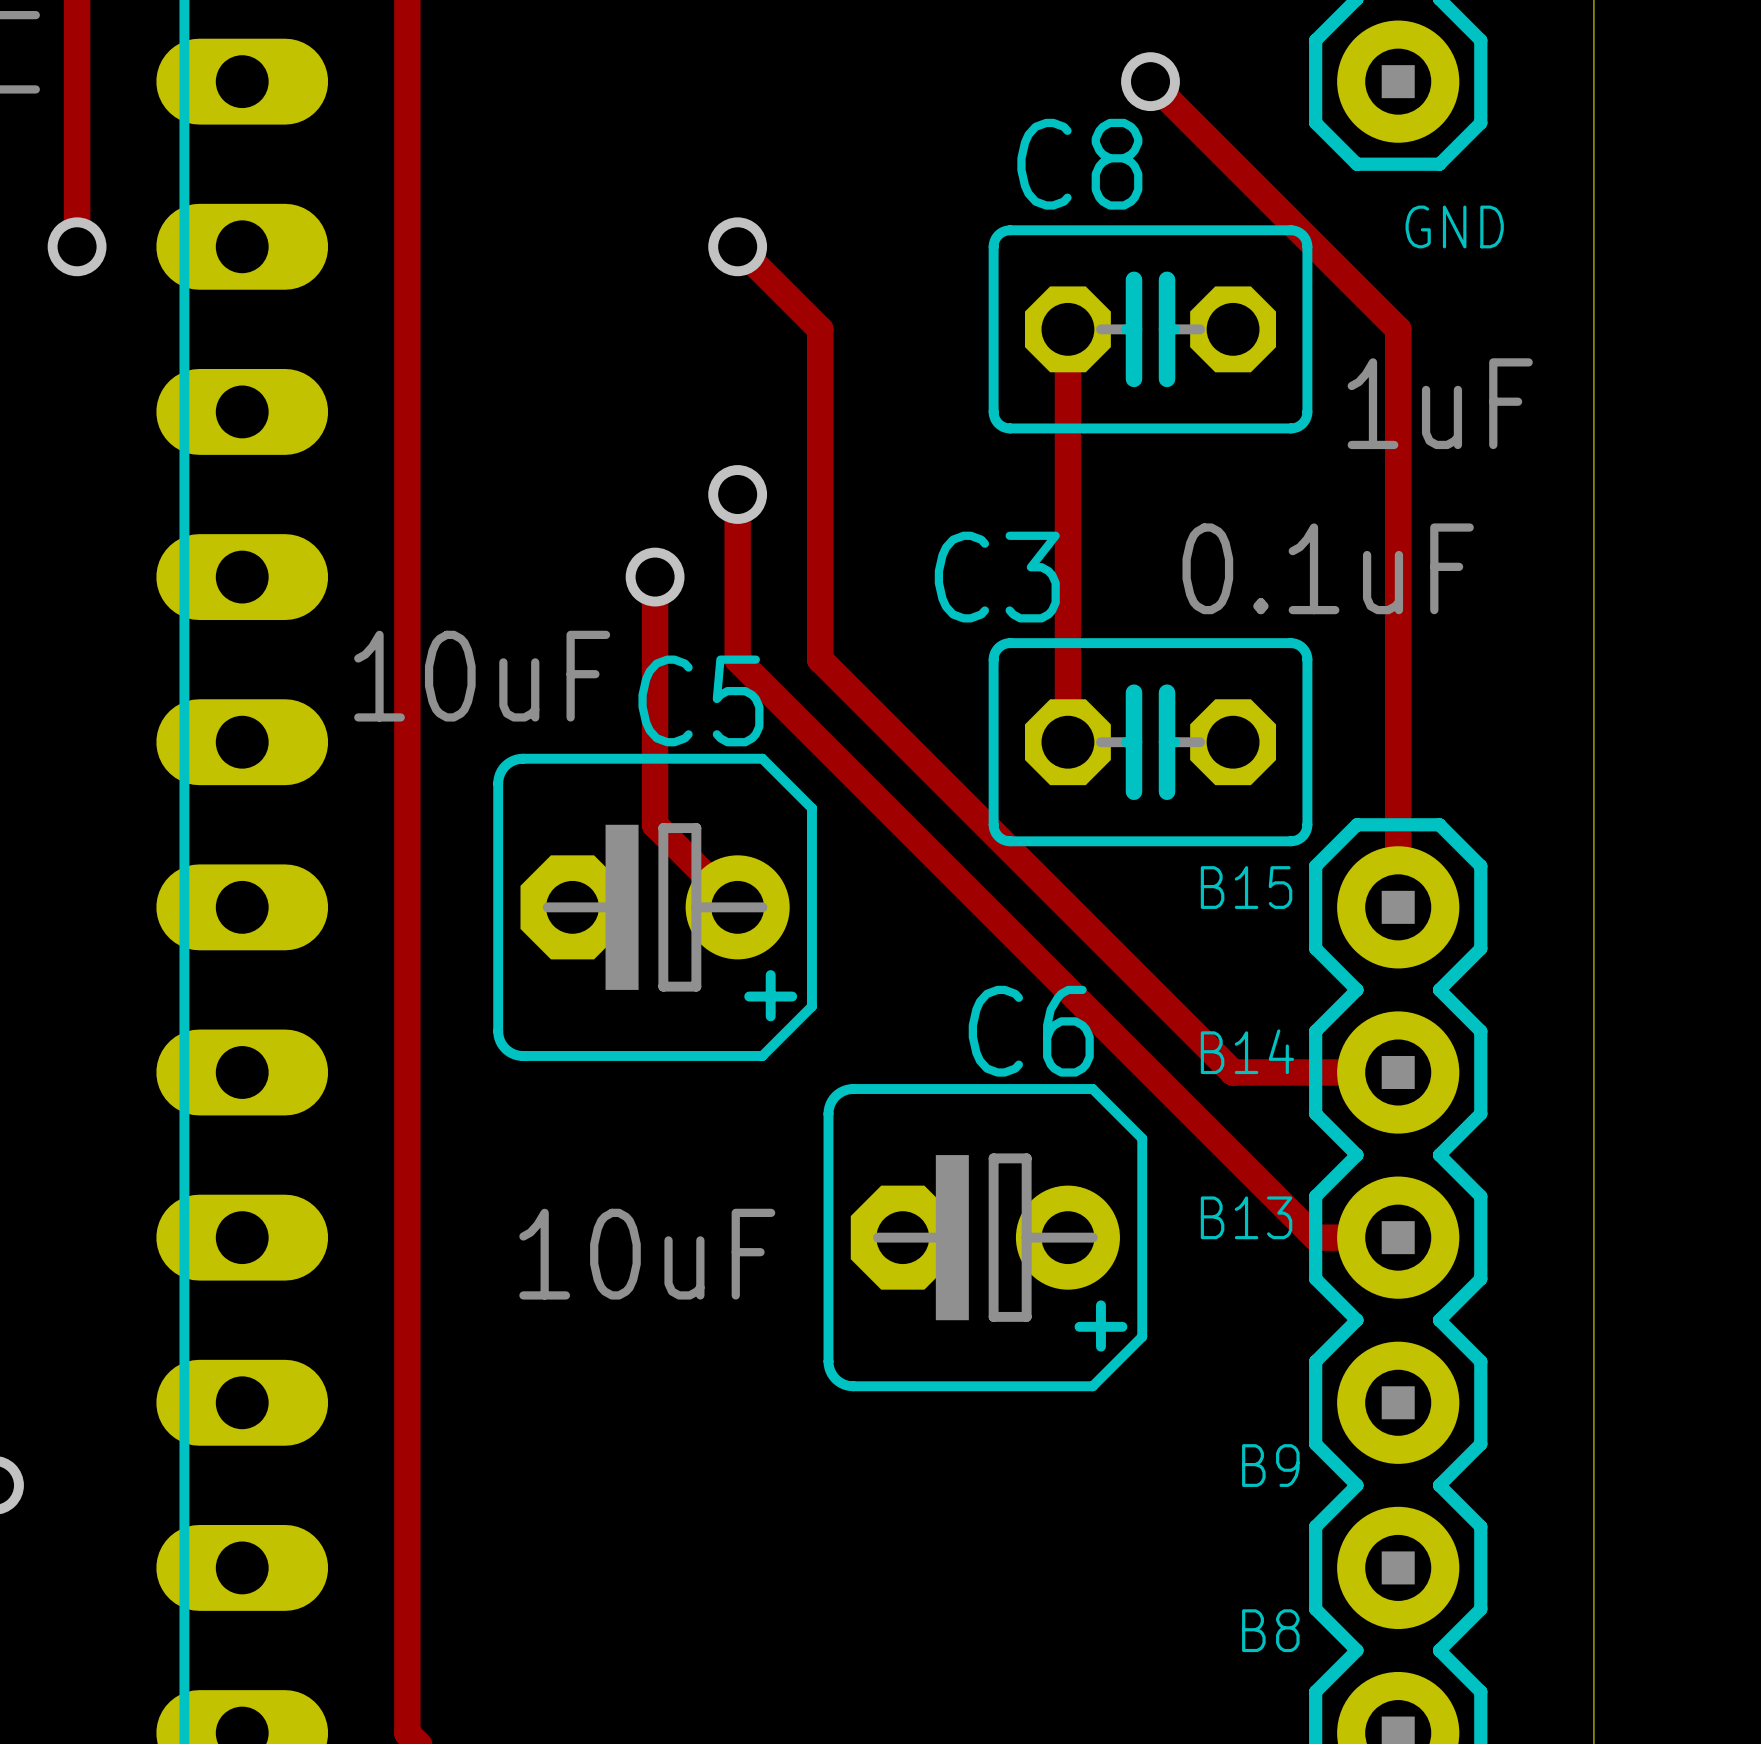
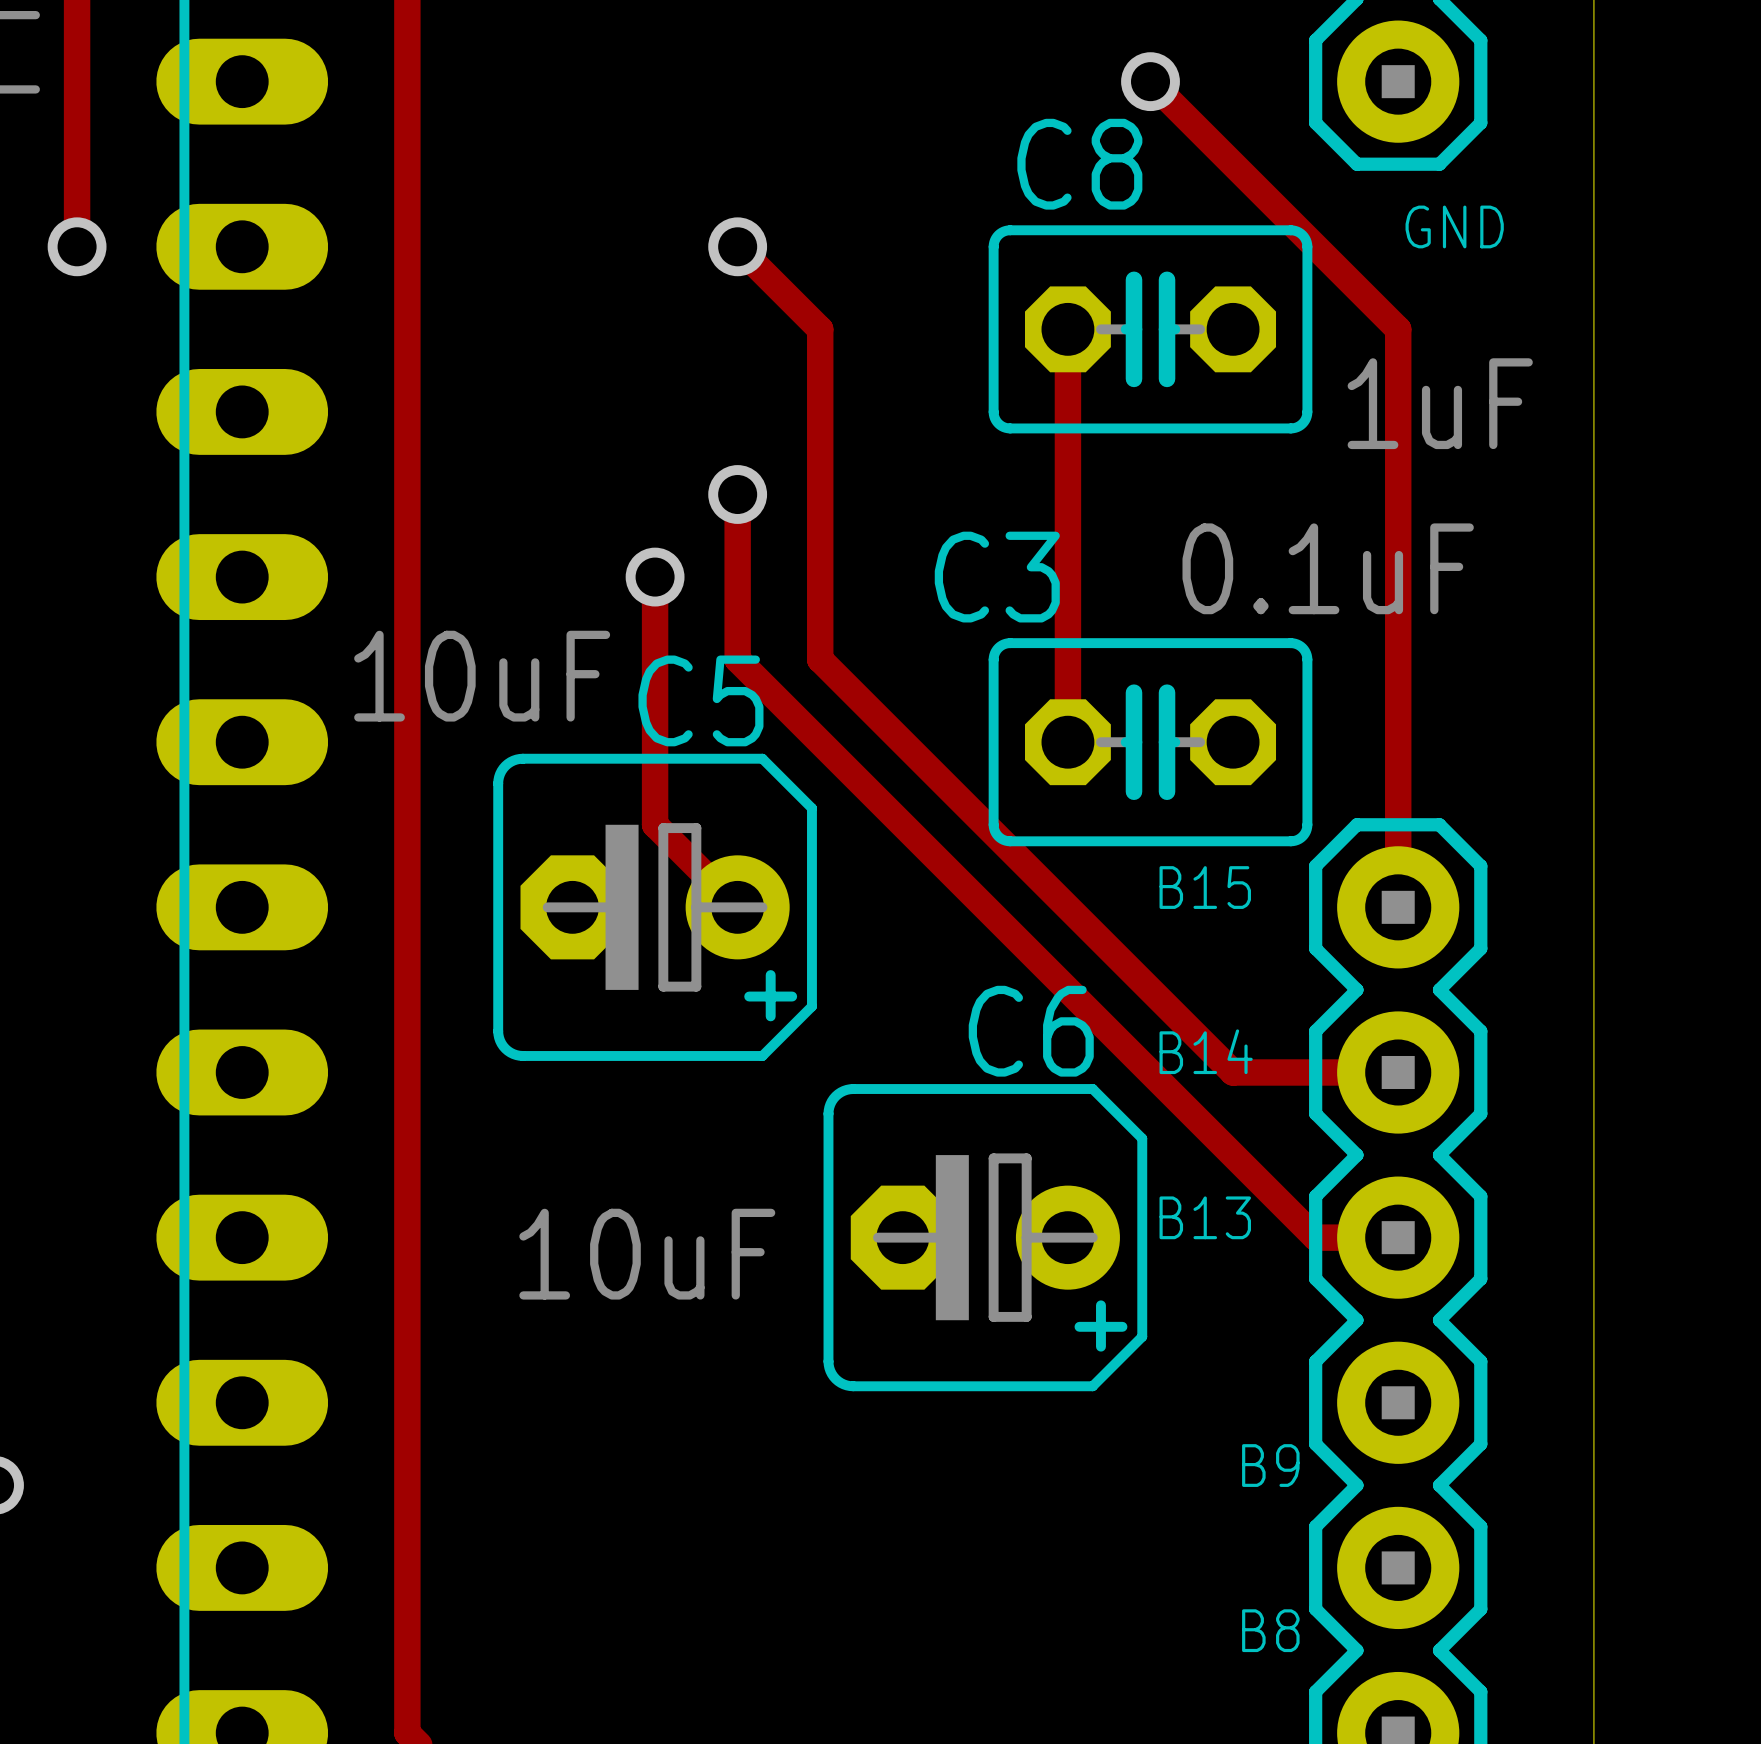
text position: B15 (1246, 887) -> B15 (1205, 887)
text position: B14 (1247, 1051) -> B14 (1206, 1051)
text position: B13 (1246, 1217) -> B13 (1205, 1217)

